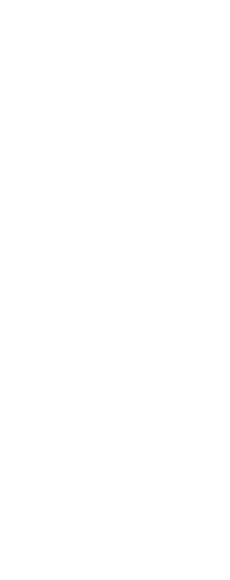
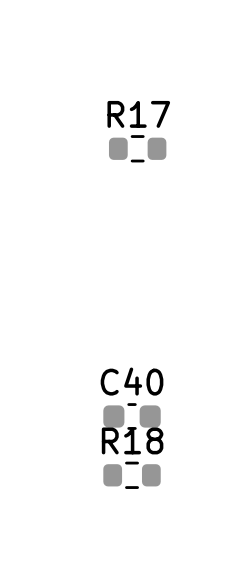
R17: none -> (137, 148)
C40: none -> (132, 416)
R18: none -> (132, 475)

